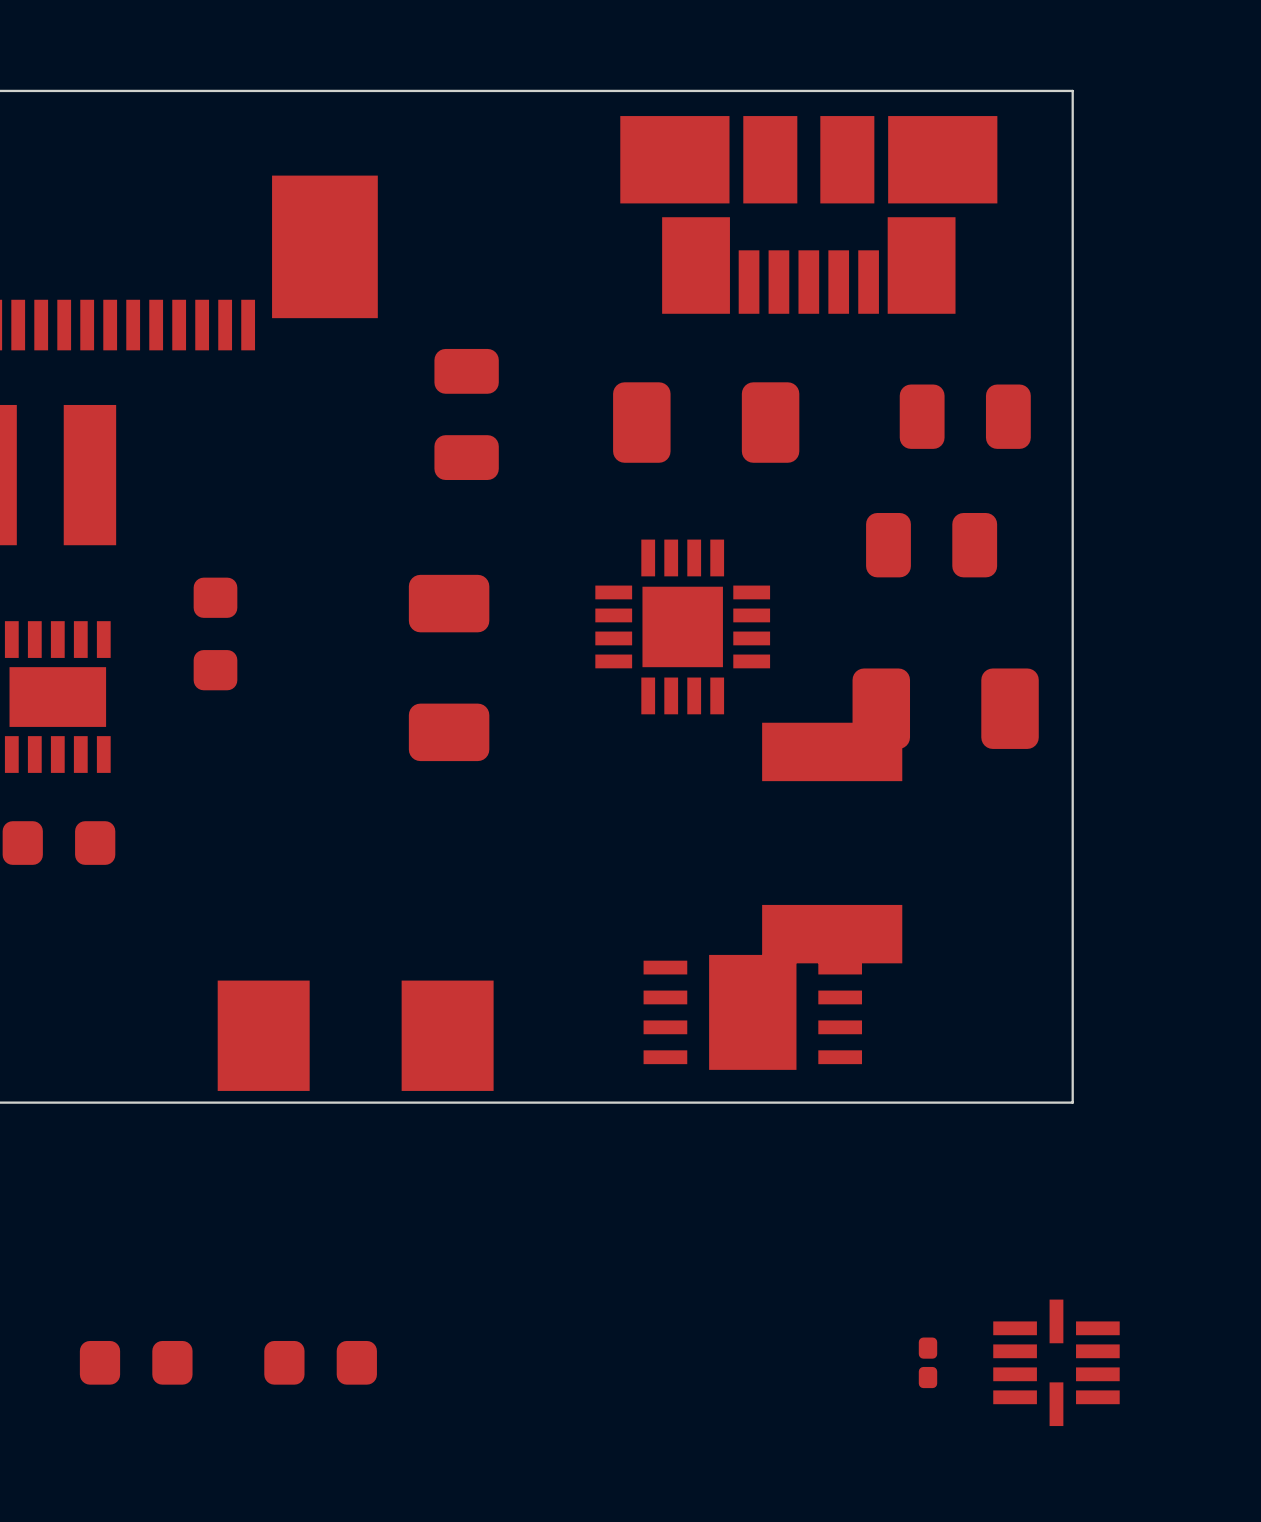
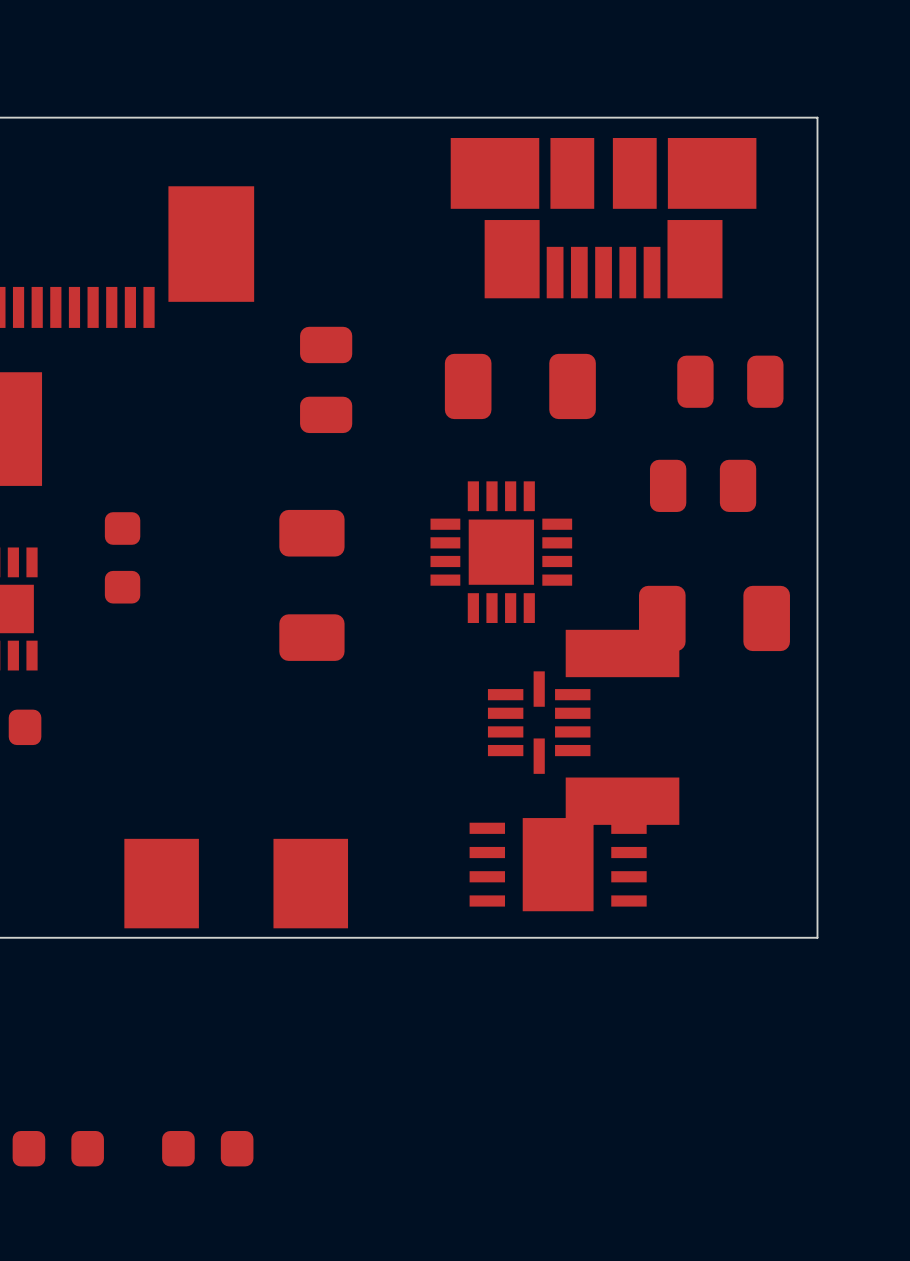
part: (927, 1362) -> none
part position: (1056, 1362) -> (539, 722)

